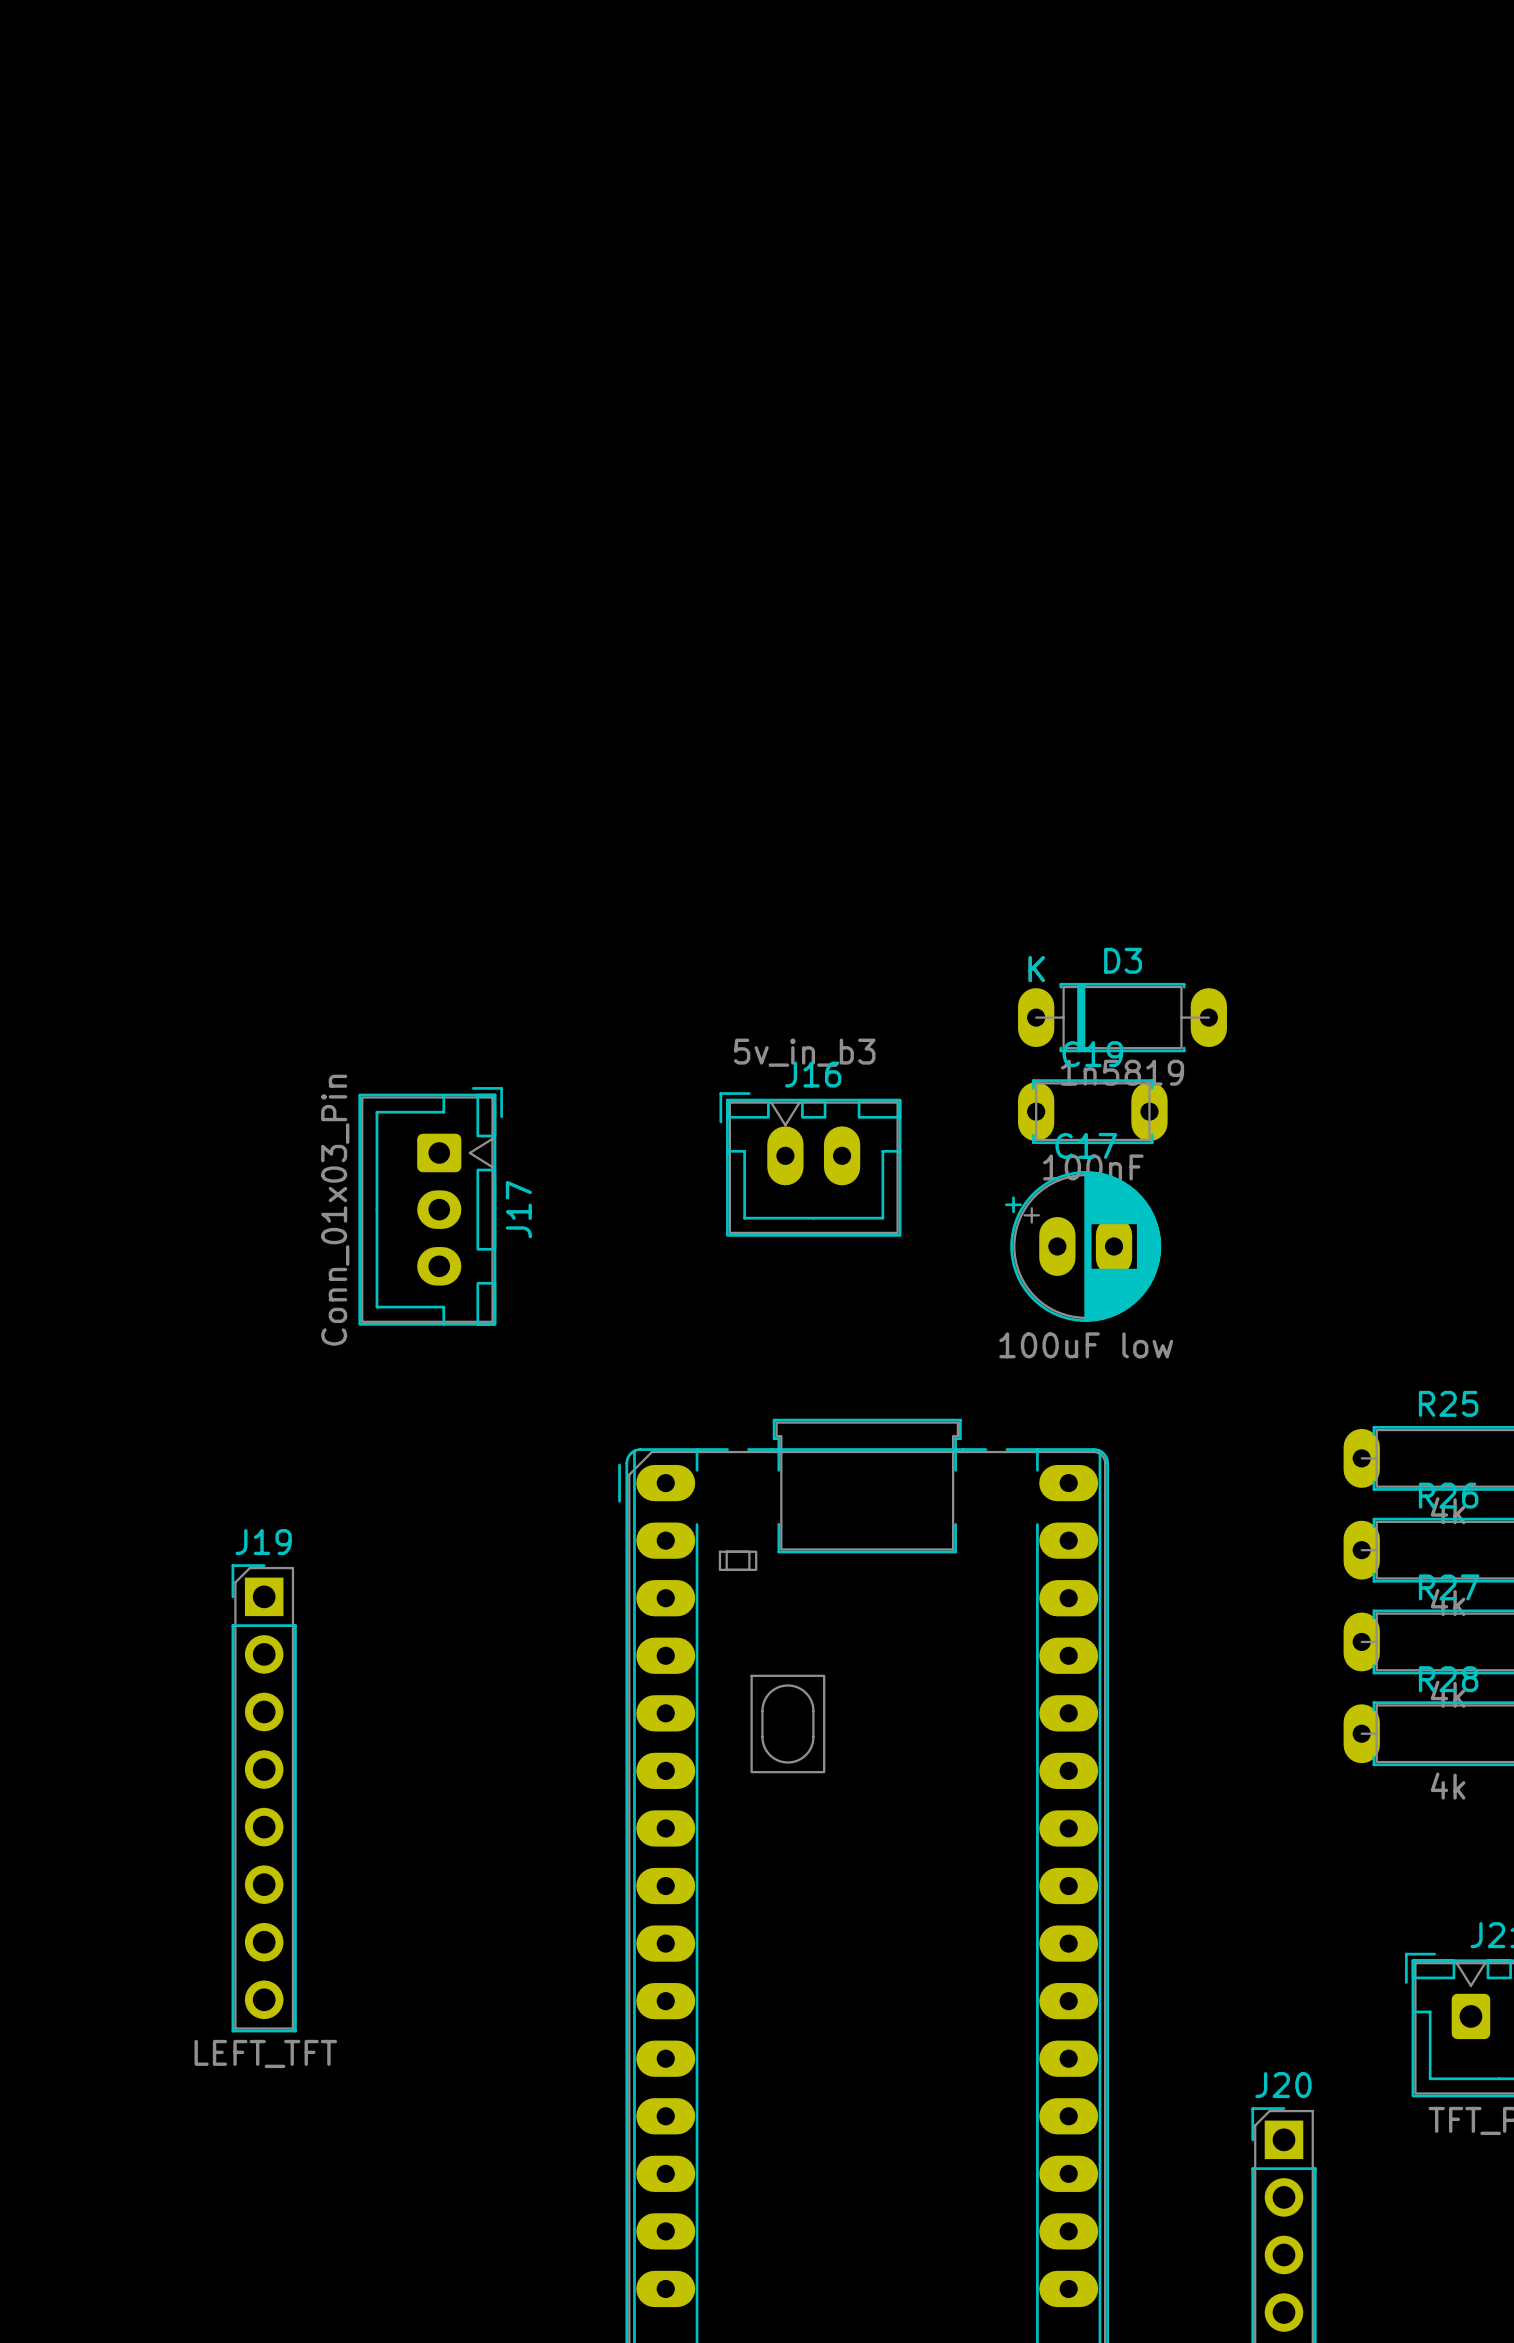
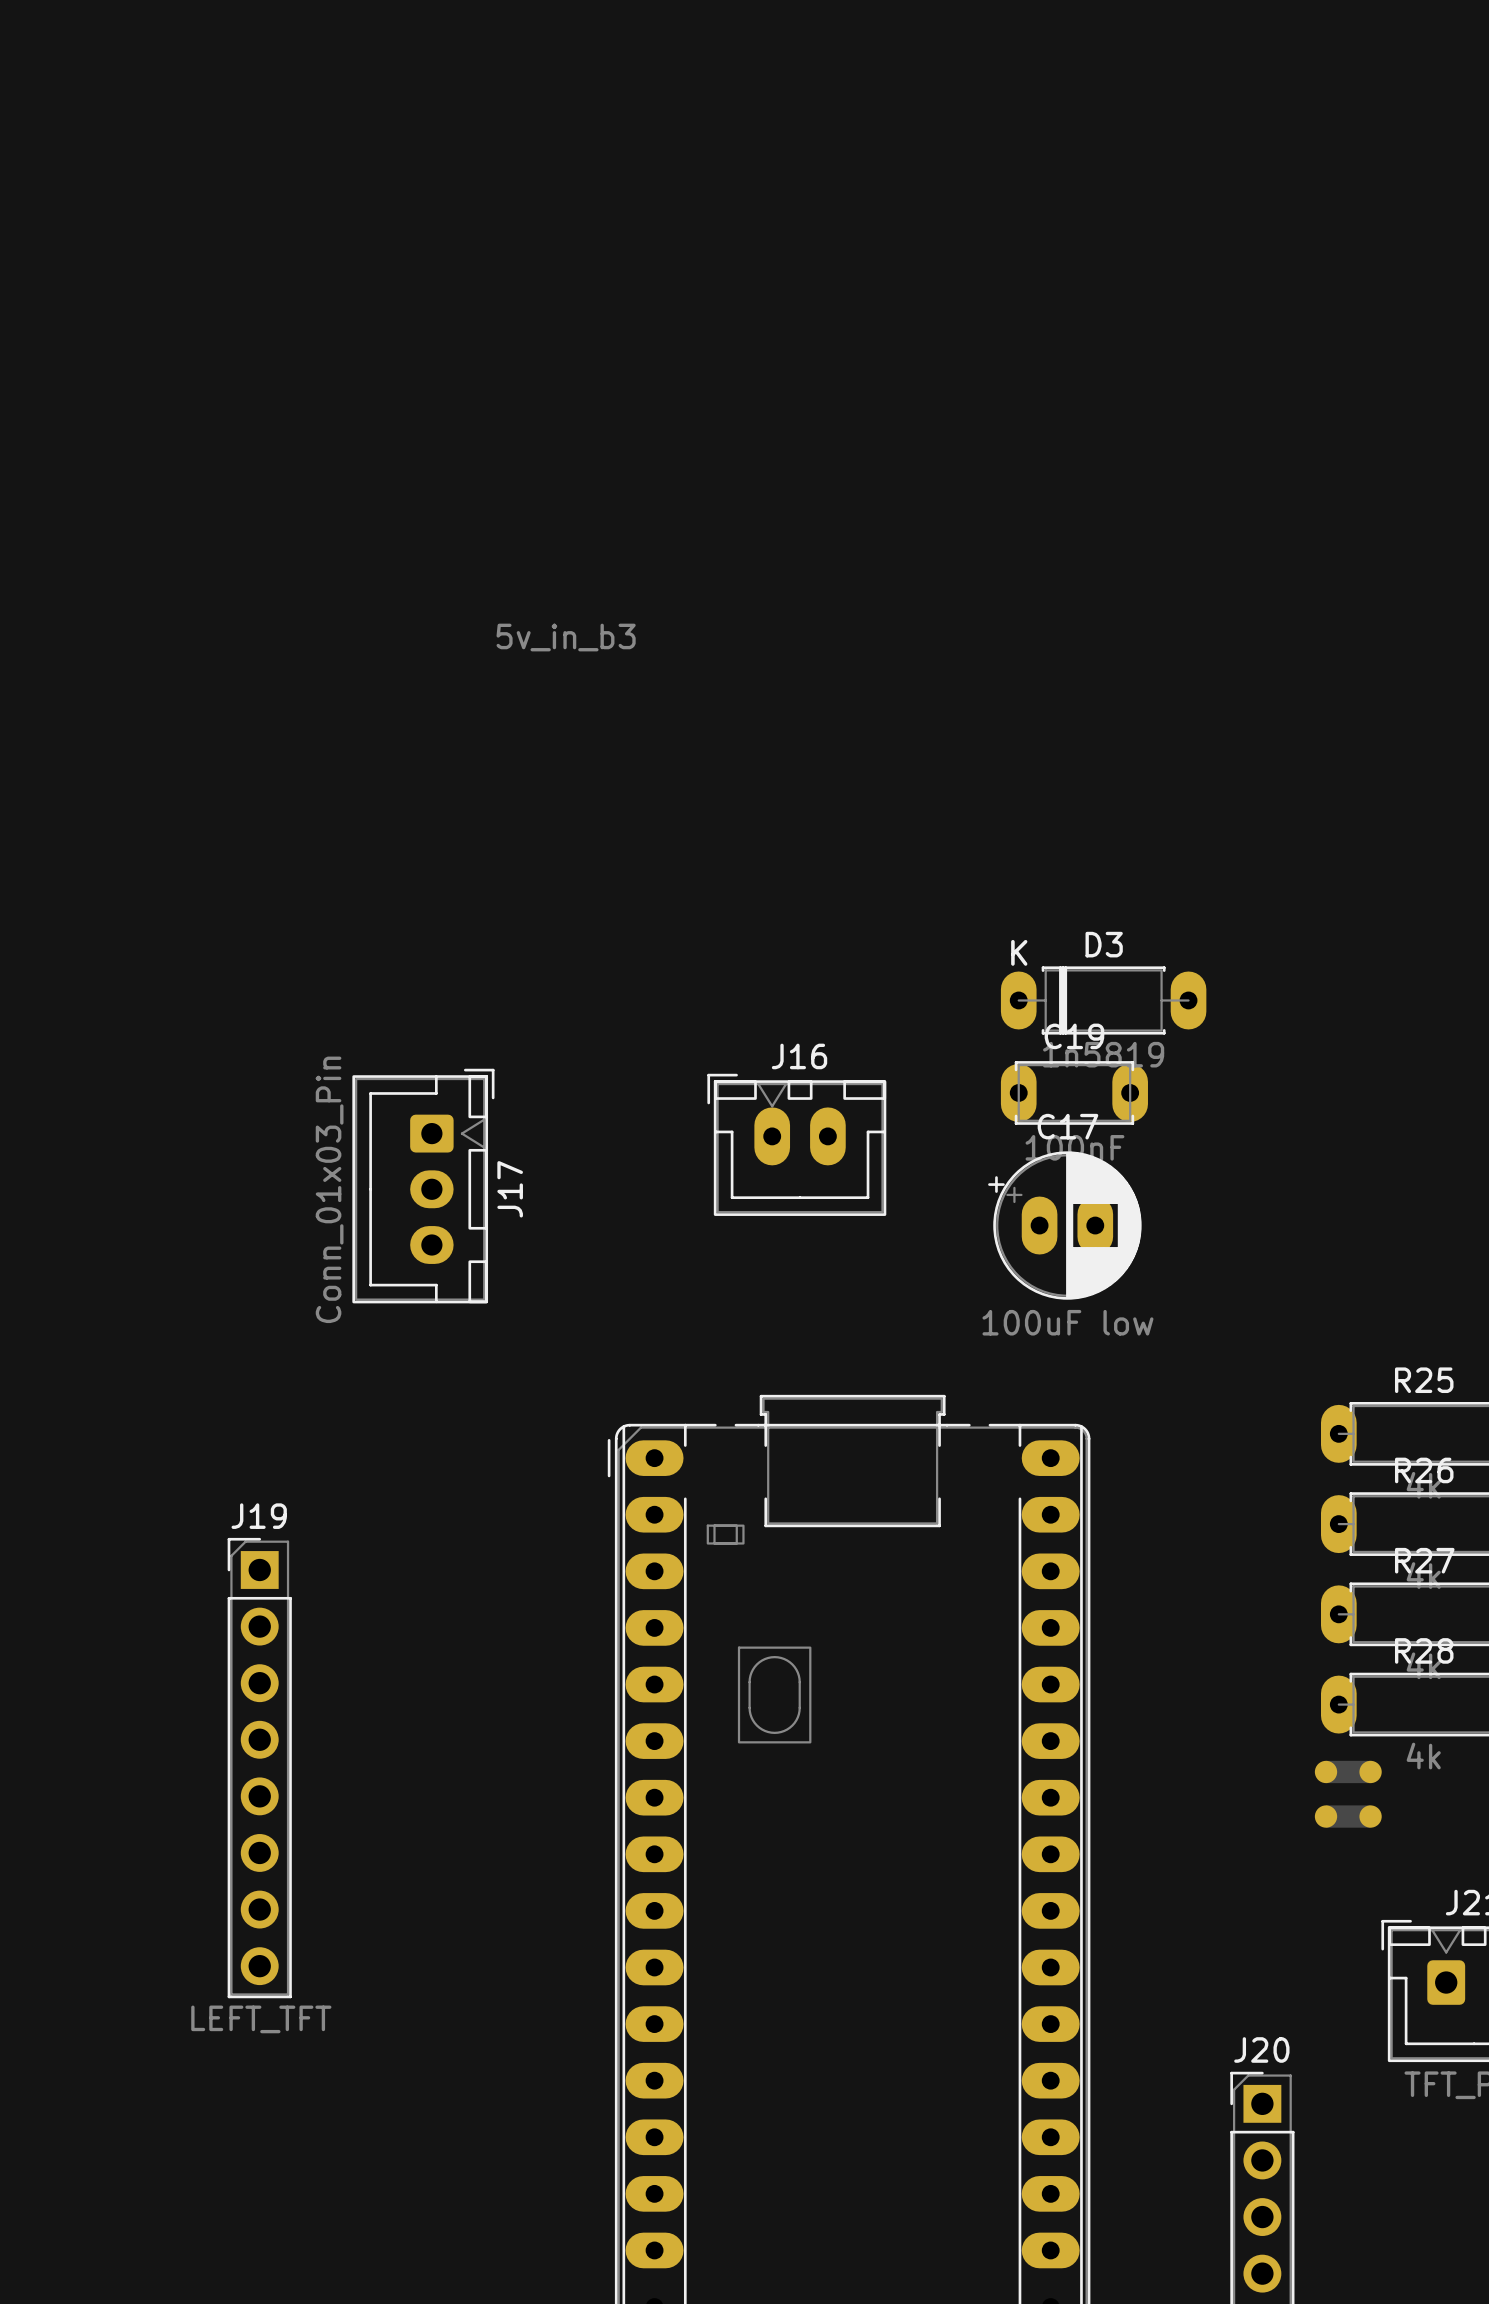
J16 value position: 5v_in_b3 (804, 1052) -> 5v_in_b3 (566, 637)
part: none -> (1348, 1771)
part: none -> (1348, 1816)

